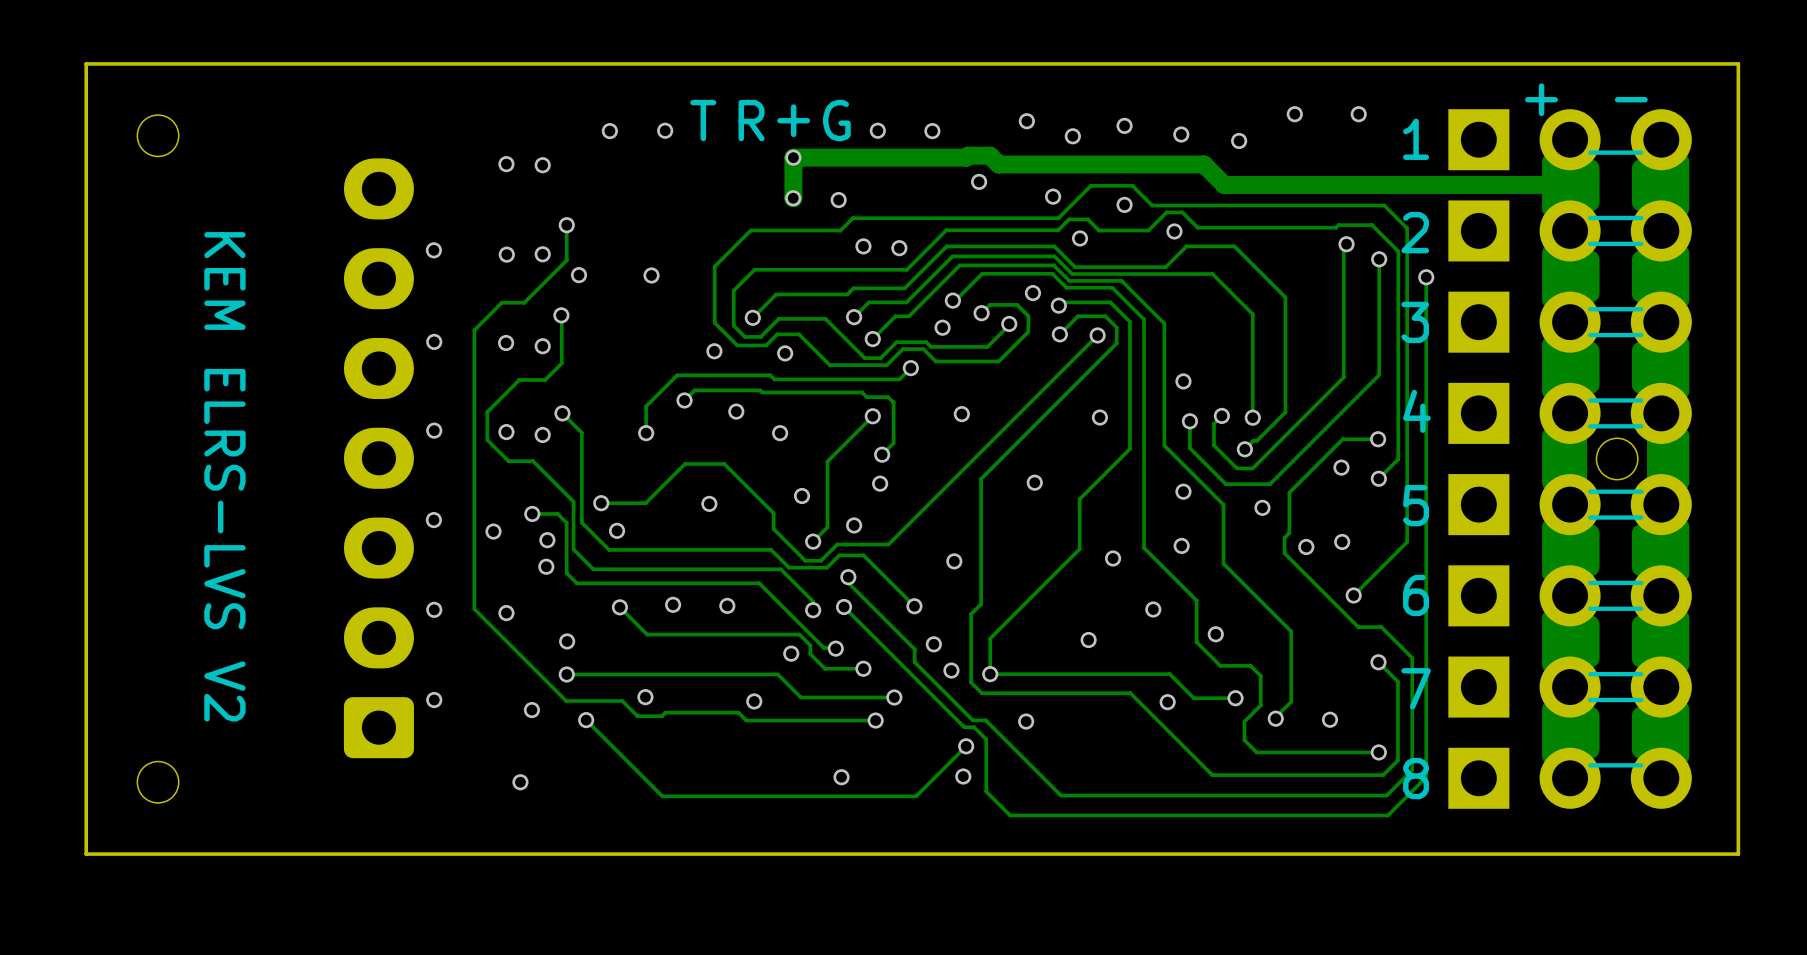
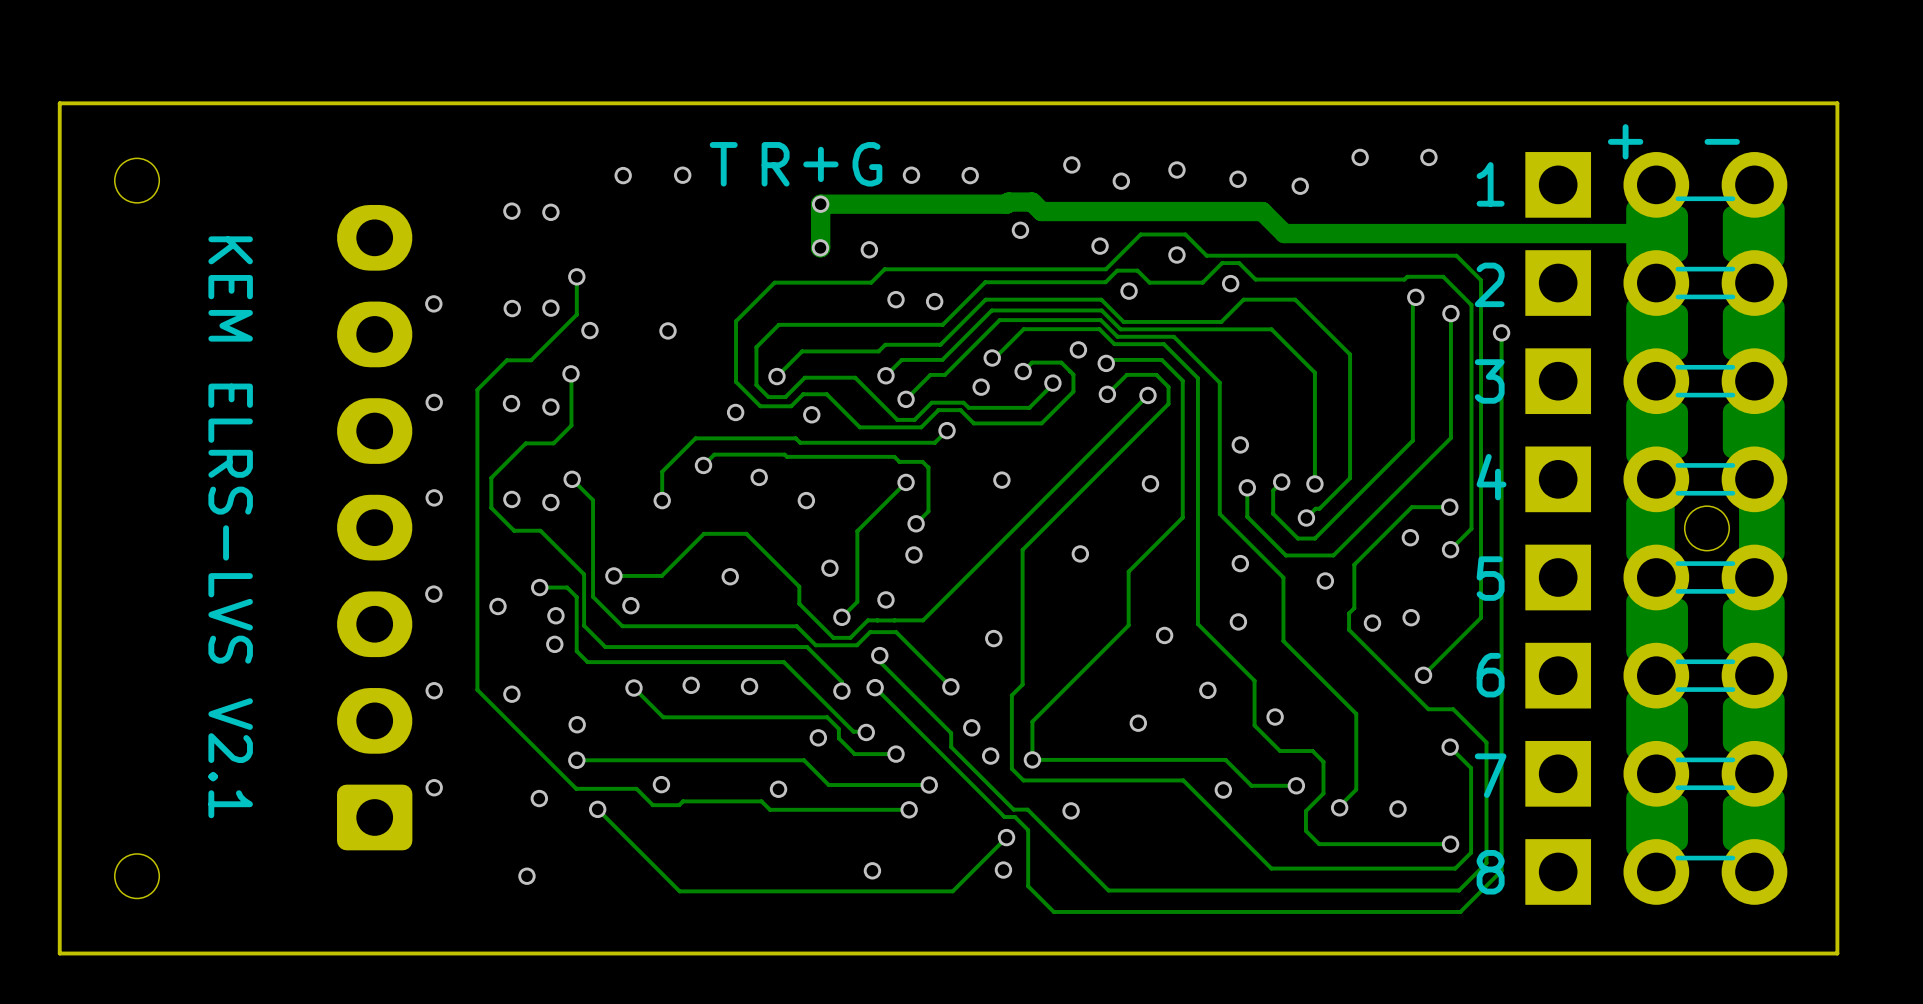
text: KEM ELRS-LVS V2 (224, 476) -> KEM ELRS-LVS V2.1 (230, 527)

